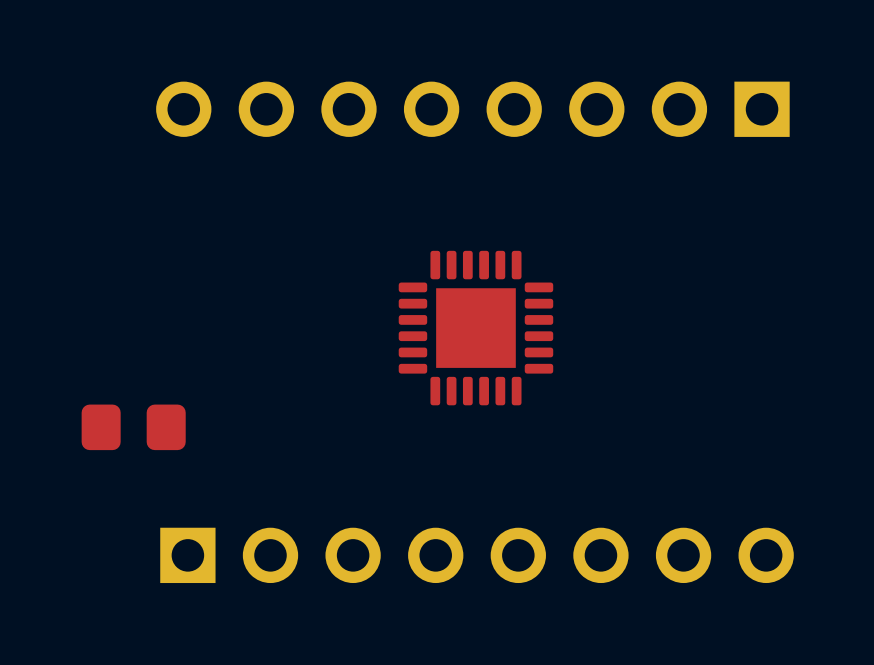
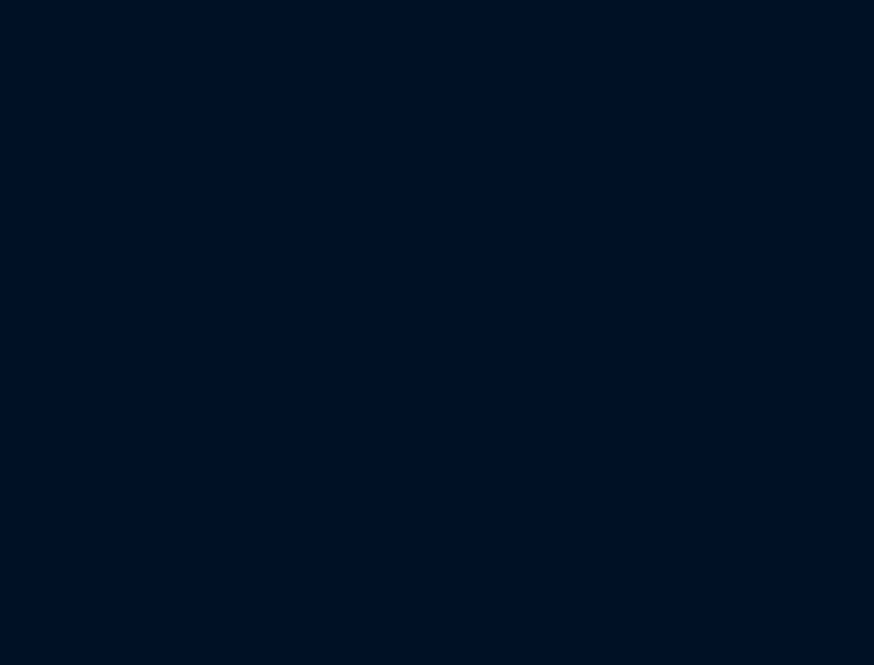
part: (472, 109) -> none
part: (475, 328) -> none
part: (133, 427) -> none
part: (477, 555) -> none

